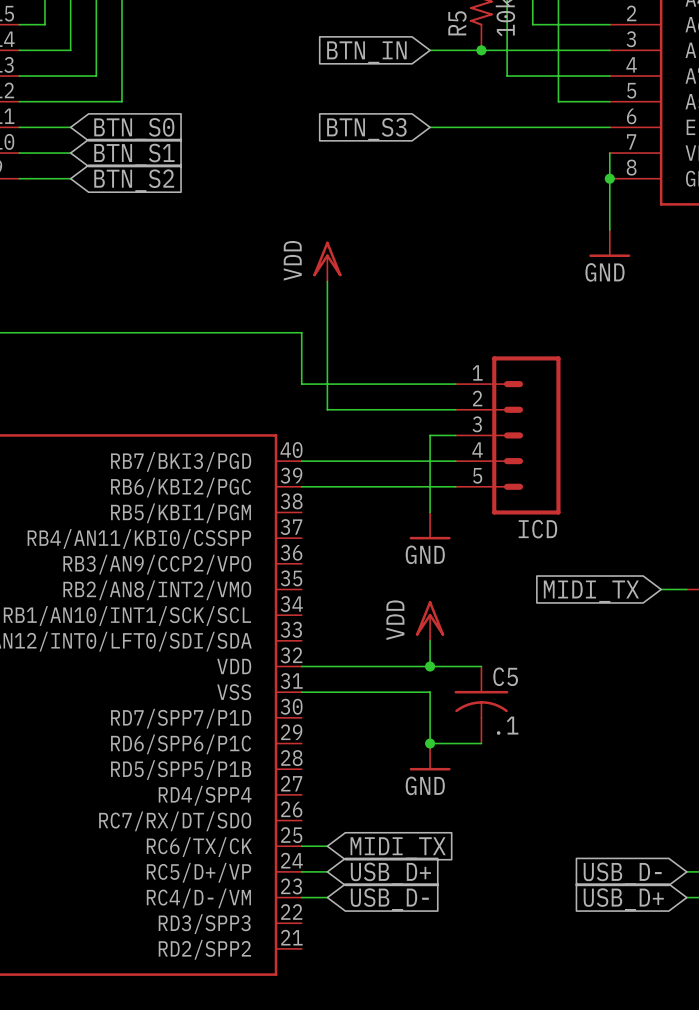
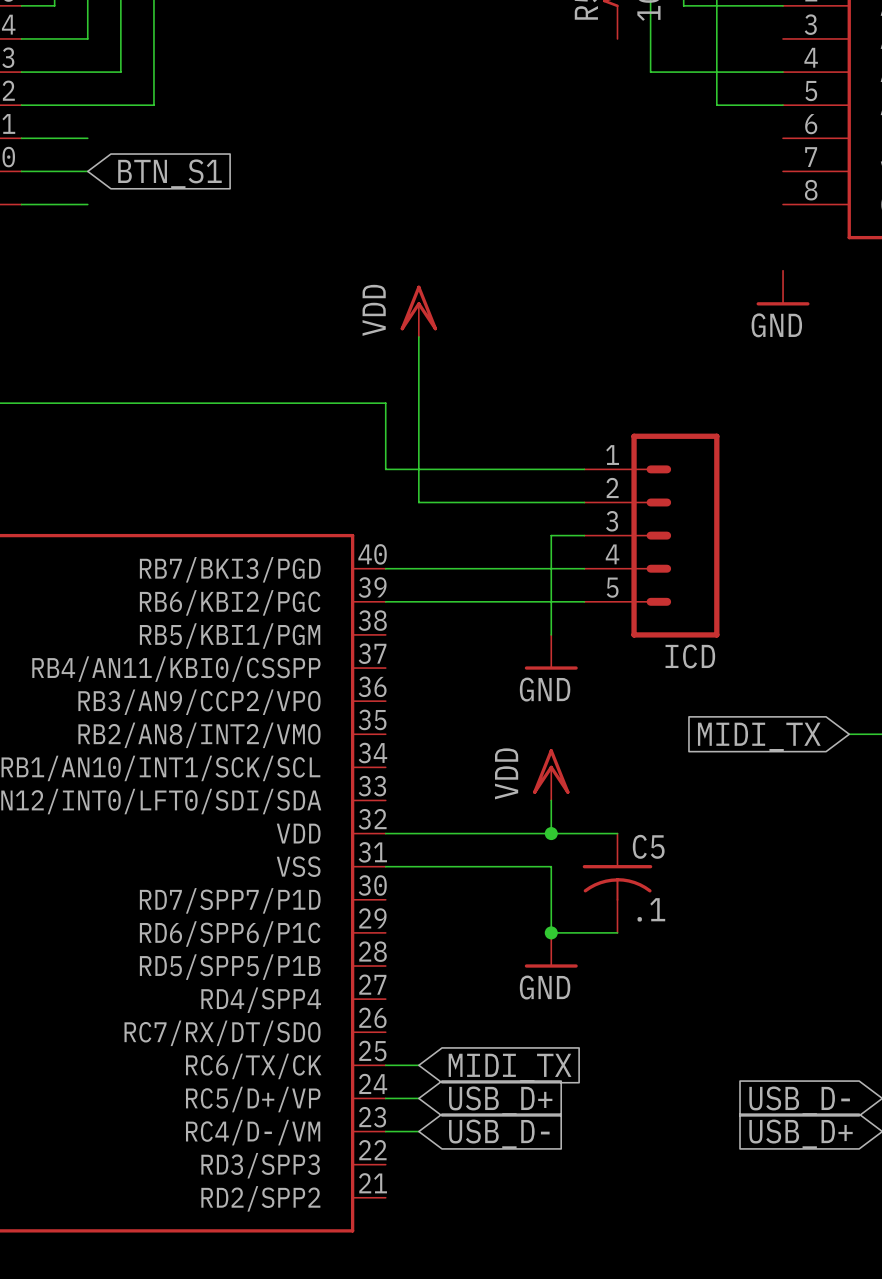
wire: (430, 50) (609, 50) -> none
junction: (481, 50) -> none
global label: BTN_IN (366, 52) -> none
wire: (430, 127) (609, 127) -> none
global label: BTN_S0 (134, 129) -> none
global label: BTN_S3 (366, 129) -> none
wire: (609, 153) (609, 230) -> none
junction: (609, 178) -> none
global label: BTN_S2 (134, 180) -> none

